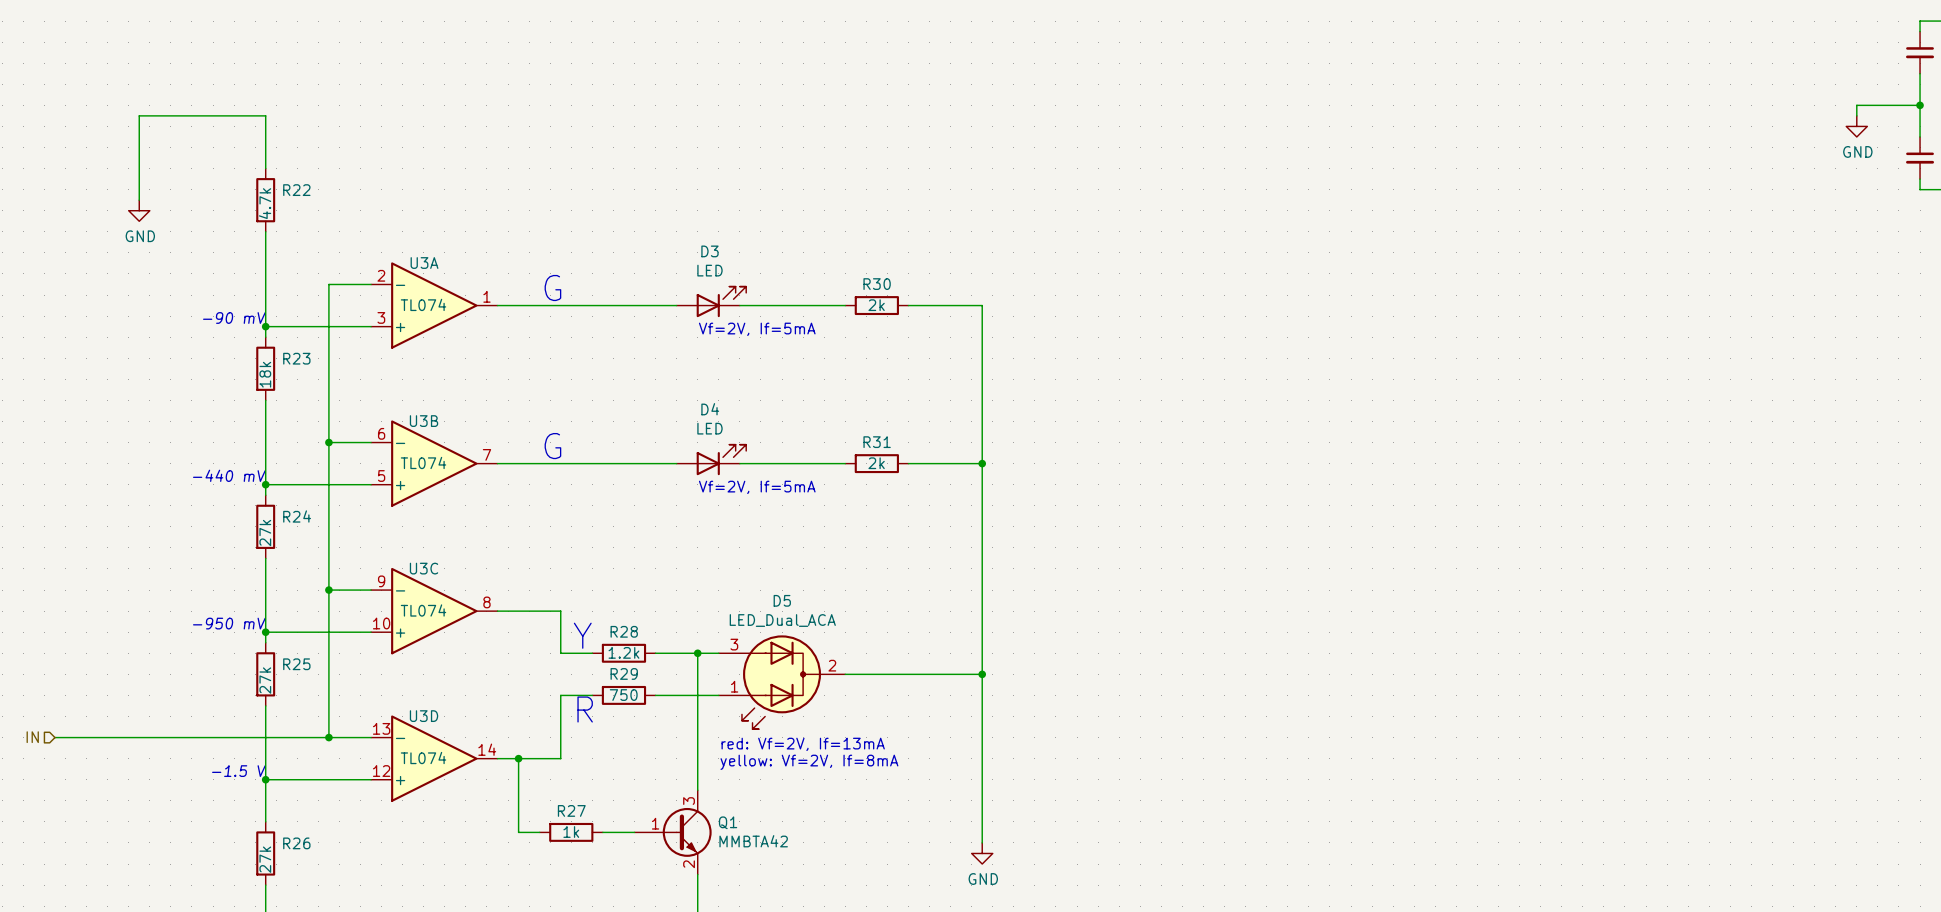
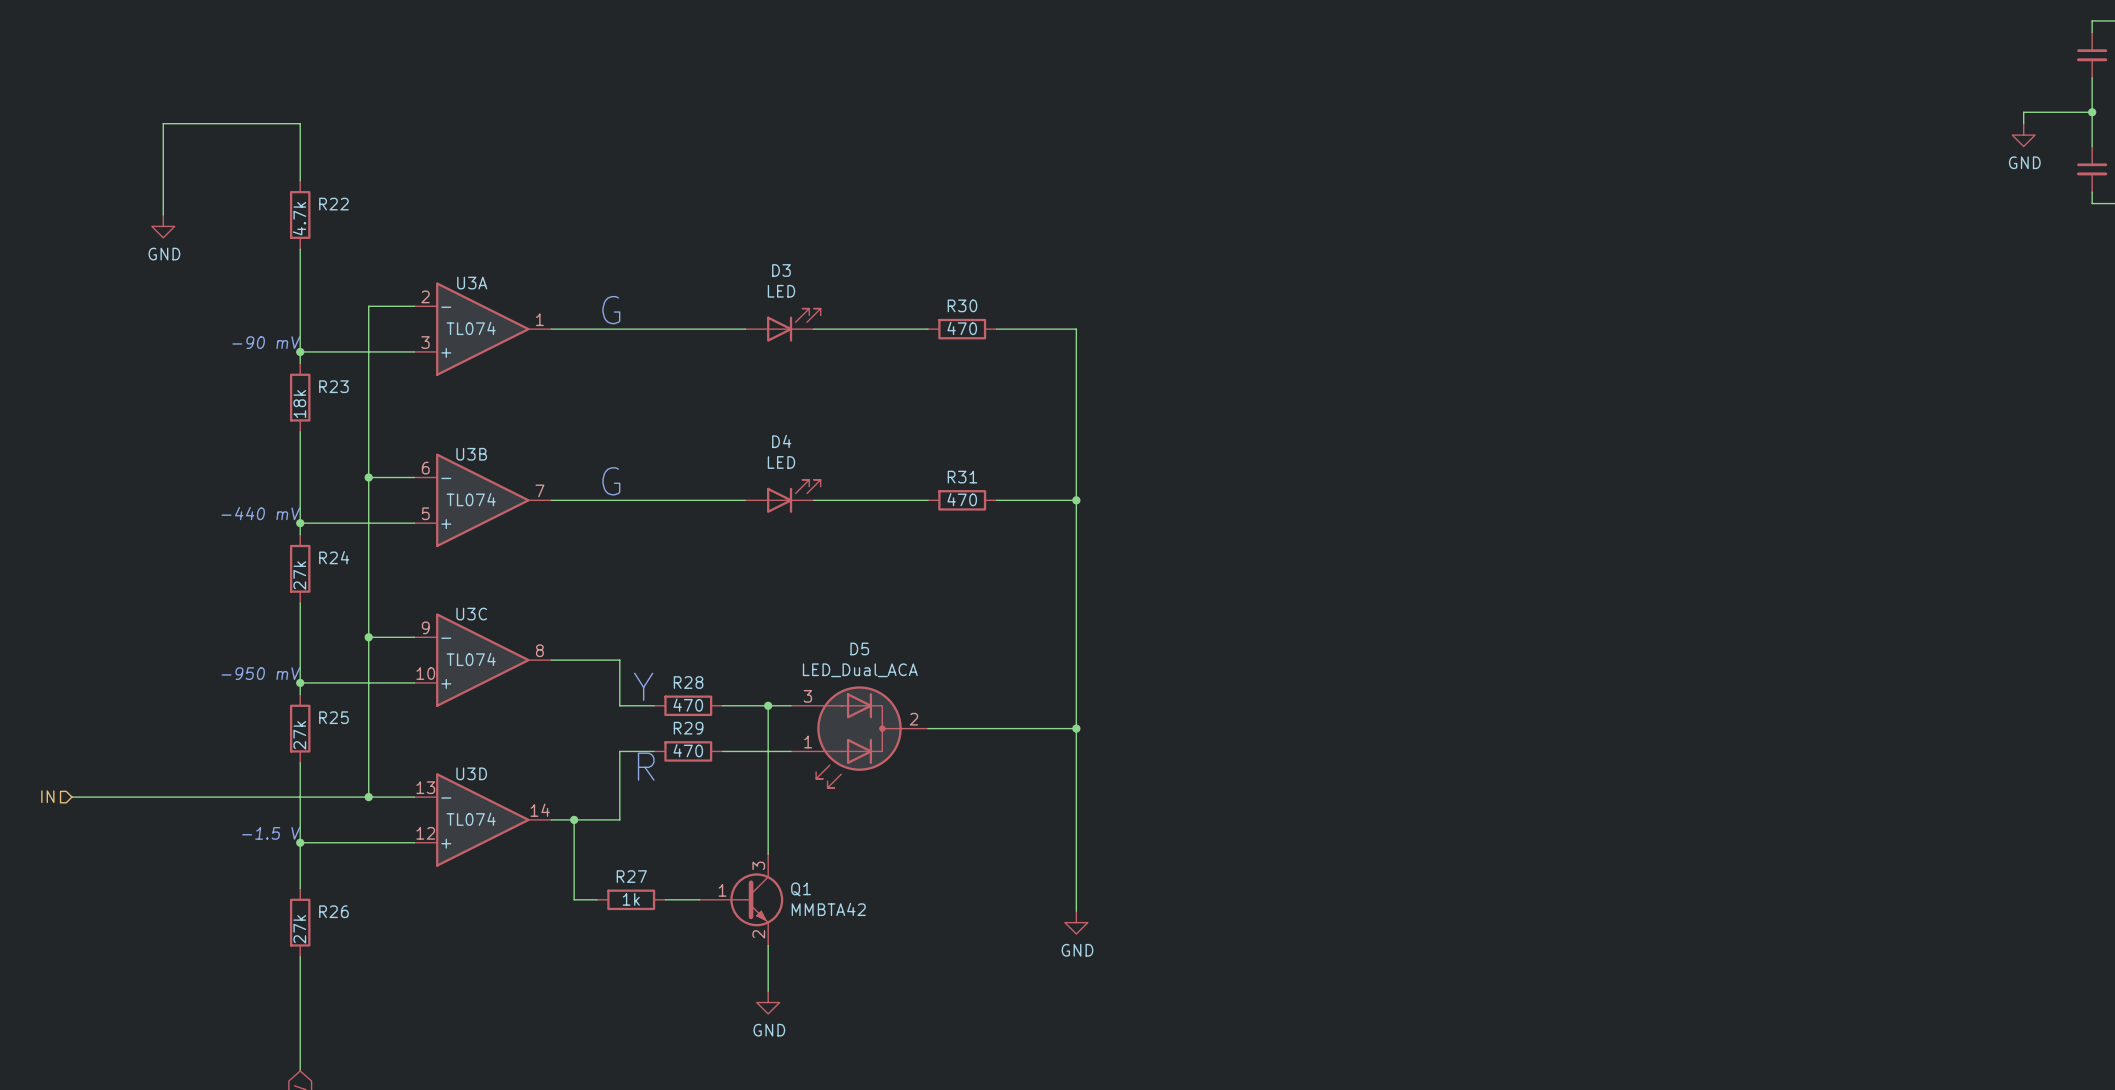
R30 value: 2k (876, 305) -> 470 (962, 328)
text: Vf=2V, If=5mA (757, 329) -> none
R31 value: 2k (876, 463) -> 470 (962, 499)
text: Vf=2V, If=5mA (757, 487) -> none
R28 value: 1.2k (623, 652) -> 470 (688, 705)
R29 value: 750 (623, 695) -> 470 (688, 750)
text: red: Vf=2V, If=13mA (803, 744) -> none
text: yellow: Vf=2V, If=8mA (809, 762) -> none

